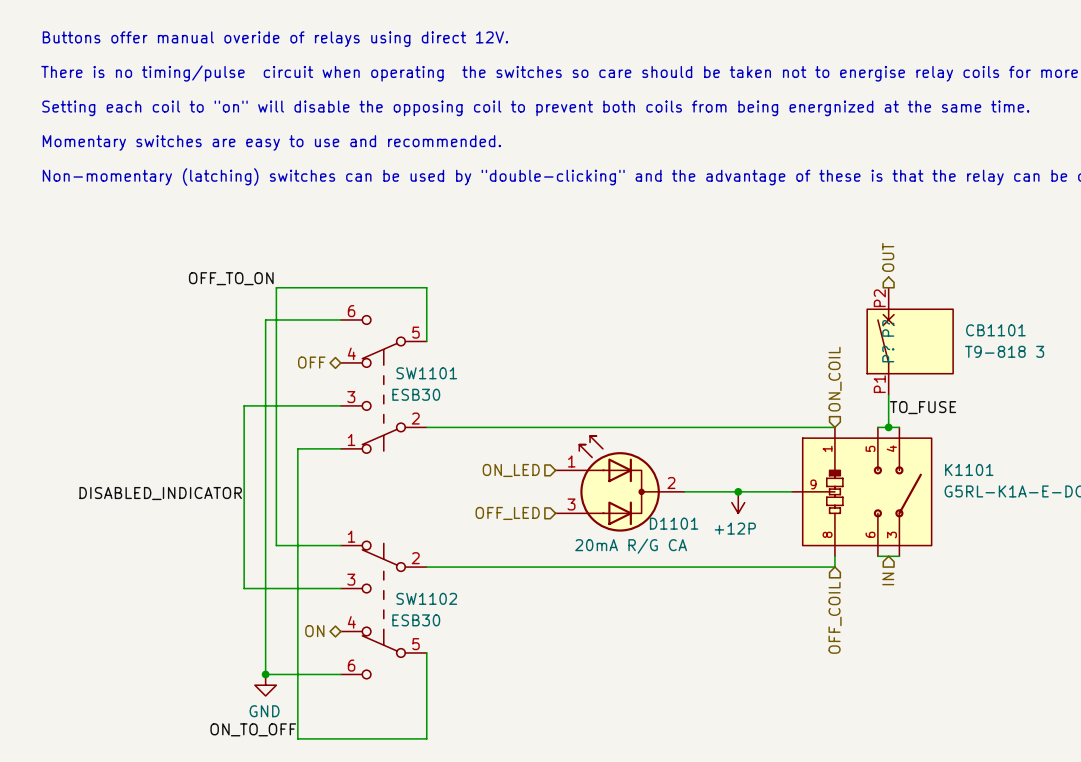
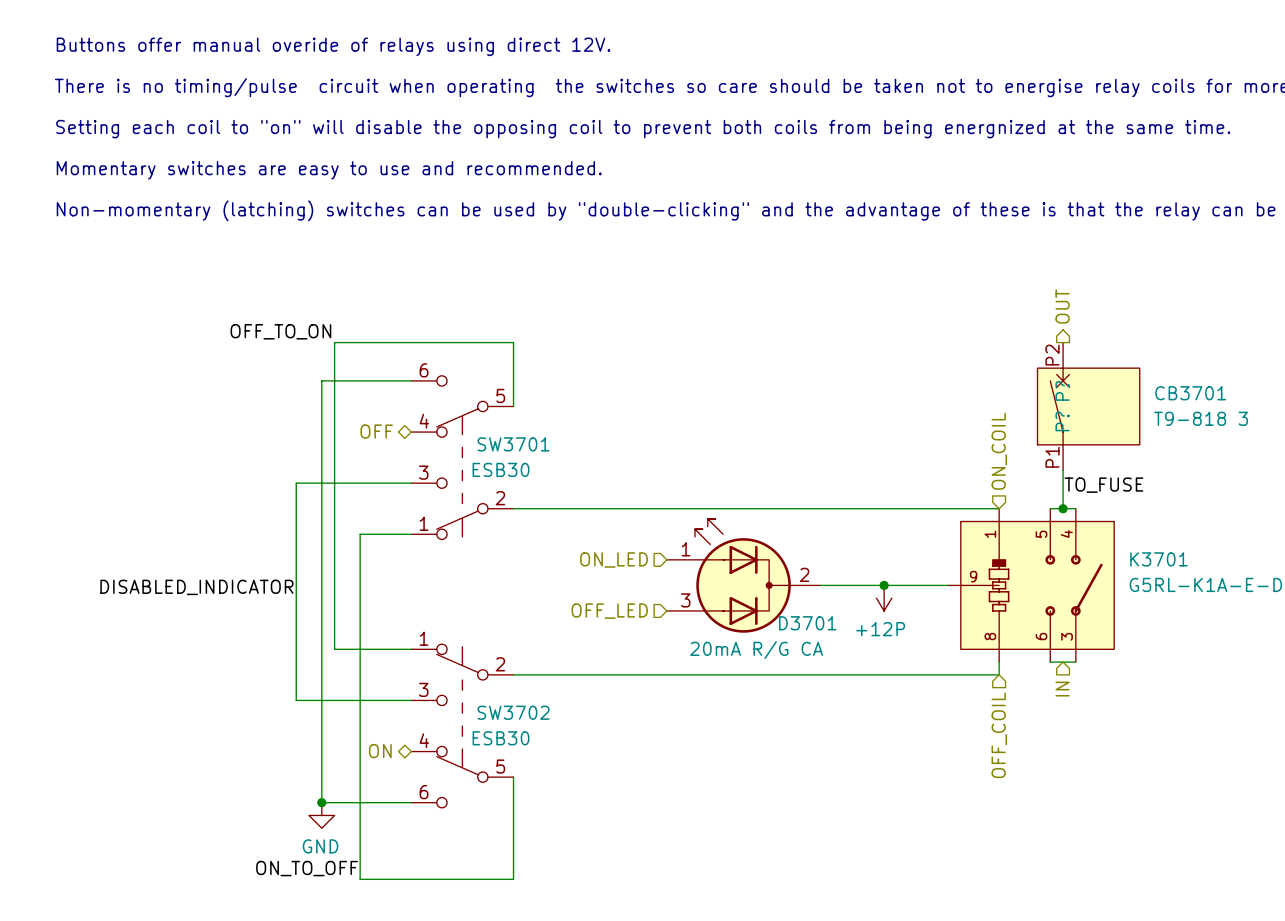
CB1101 name: CB1101 (995, 330) -> CB3701 (1190, 393)
SW1101 name: SW1101 (426, 373) -> SW3701 (513, 444)
K1101 name: K1101 (969, 469) -> K3701 (1159, 559)
D1101 name: D1101 (674, 523) -> D3701 (807, 623)
SW1102 name: SW1102 (426, 598) -> SW3702 (513, 712)

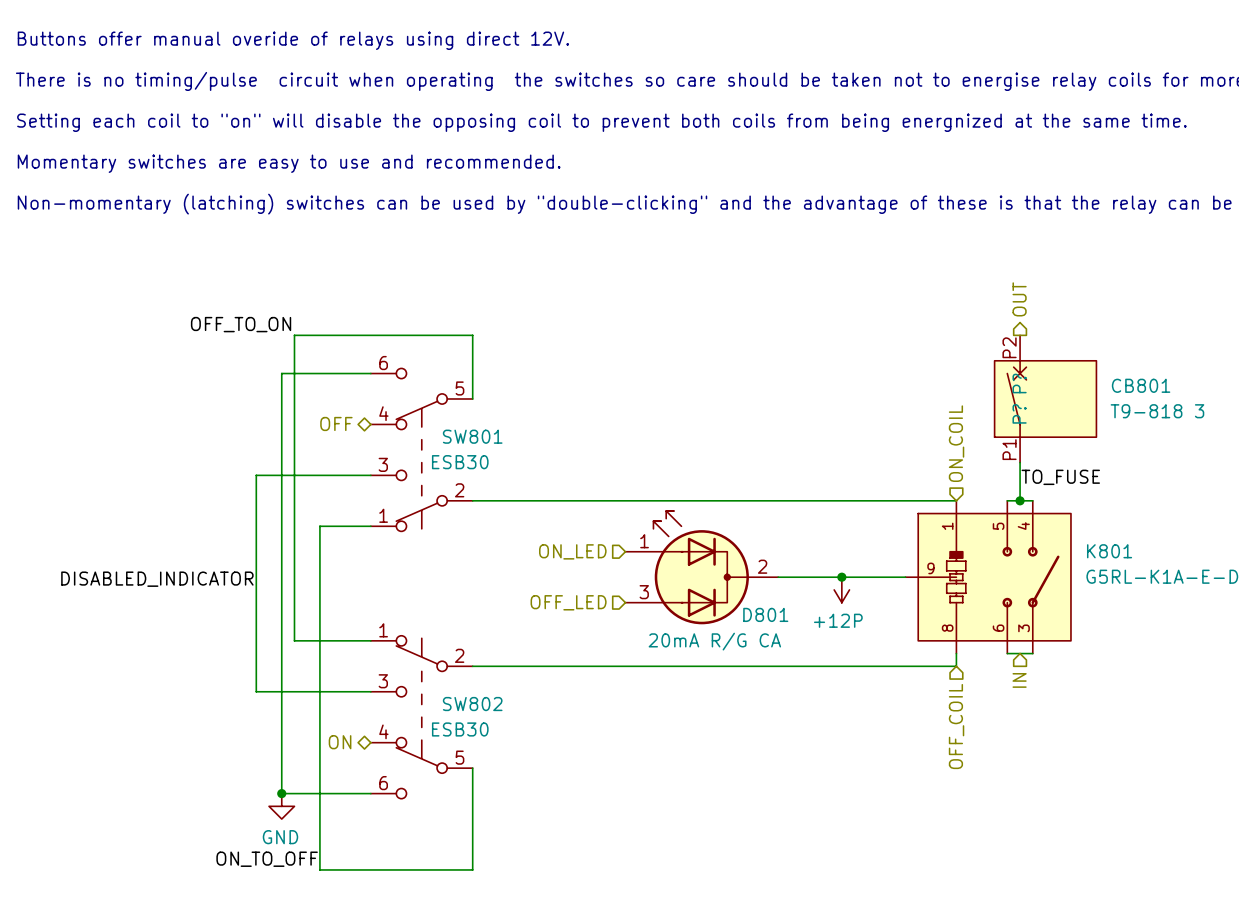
CB3701 name: CB3701 (1190, 393) -> CB801 (1141, 385)
SW3701 name: SW3701 (513, 444) -> SW801 (472, 436)
K3701 name: K3701 (1159, 559) -> K801 (1109, 551)
D3701 name: D3701 (807, 623) -> D801 (765, 614)
SW3702 name: SW3702 (513, 712) -> SW802 (472, 704)

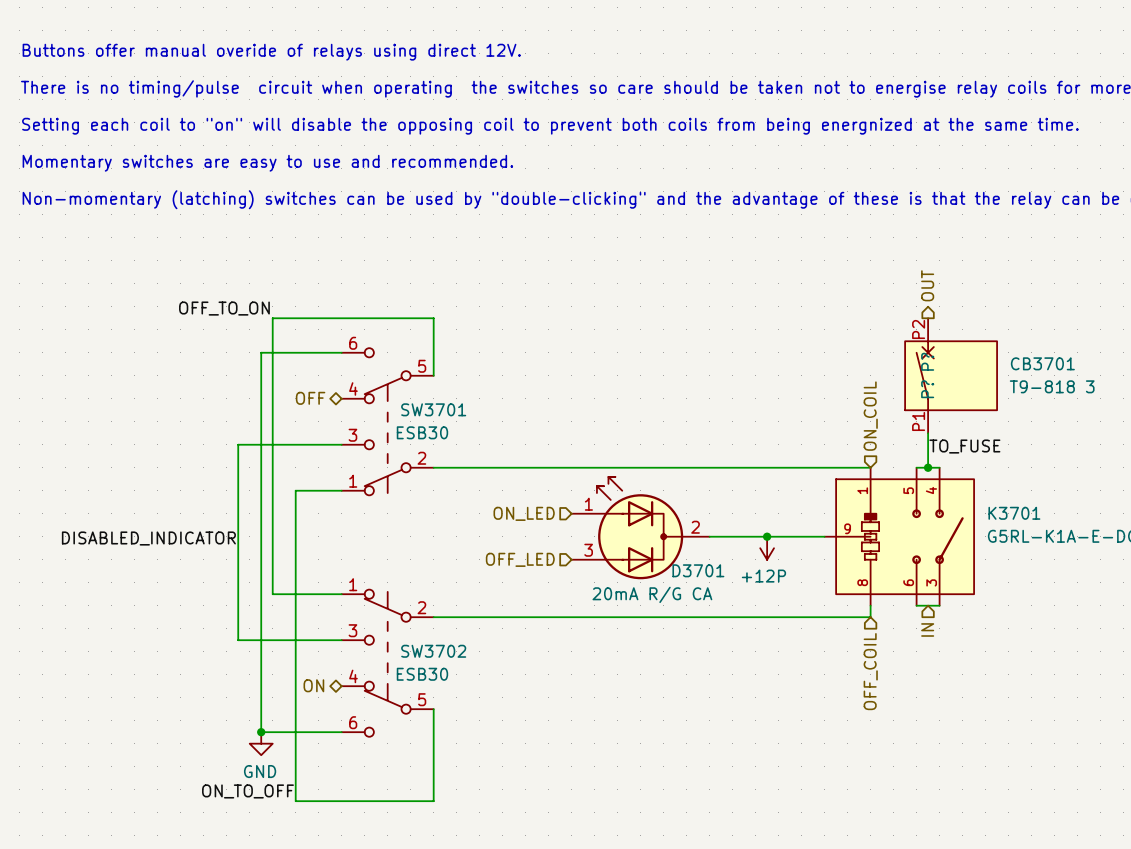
CB801 name: CB801 (1141, 385) -> CB3701 (1042, 363)
SW801 name: SW801 (472, 436) -> SW3701 (433, 409)
K801 name: K801 (1109, 551) -> K3701 (1014, 513)
D801 name: D801 (765, 614) -> D3701 (698, 570)
SW802 name: SW802 (472, 704) -> SW3702 (433, 651)

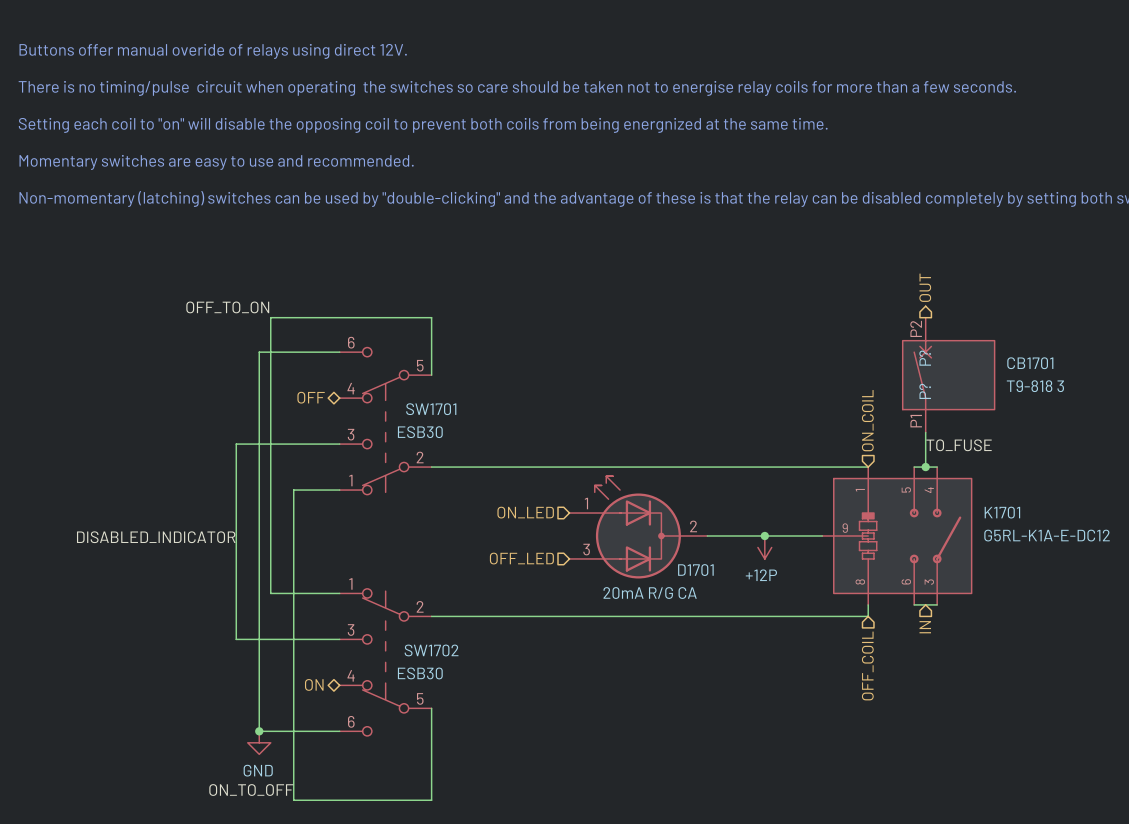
CB3701 name: CB3701 (1042, 363) -> CB1701 (1030, 363)
SW3701 name: SW3701 (433, 409) -> SW1701 (431, 409)
K3701 name: K3701 (1014, 513) -> K1701 (1002, 512)
D3701 name: D3701 (698, 570) -> D1701 (695, 570)
SW3702 name: SW3702 (433, 651) -> SW1702 (431, 650)

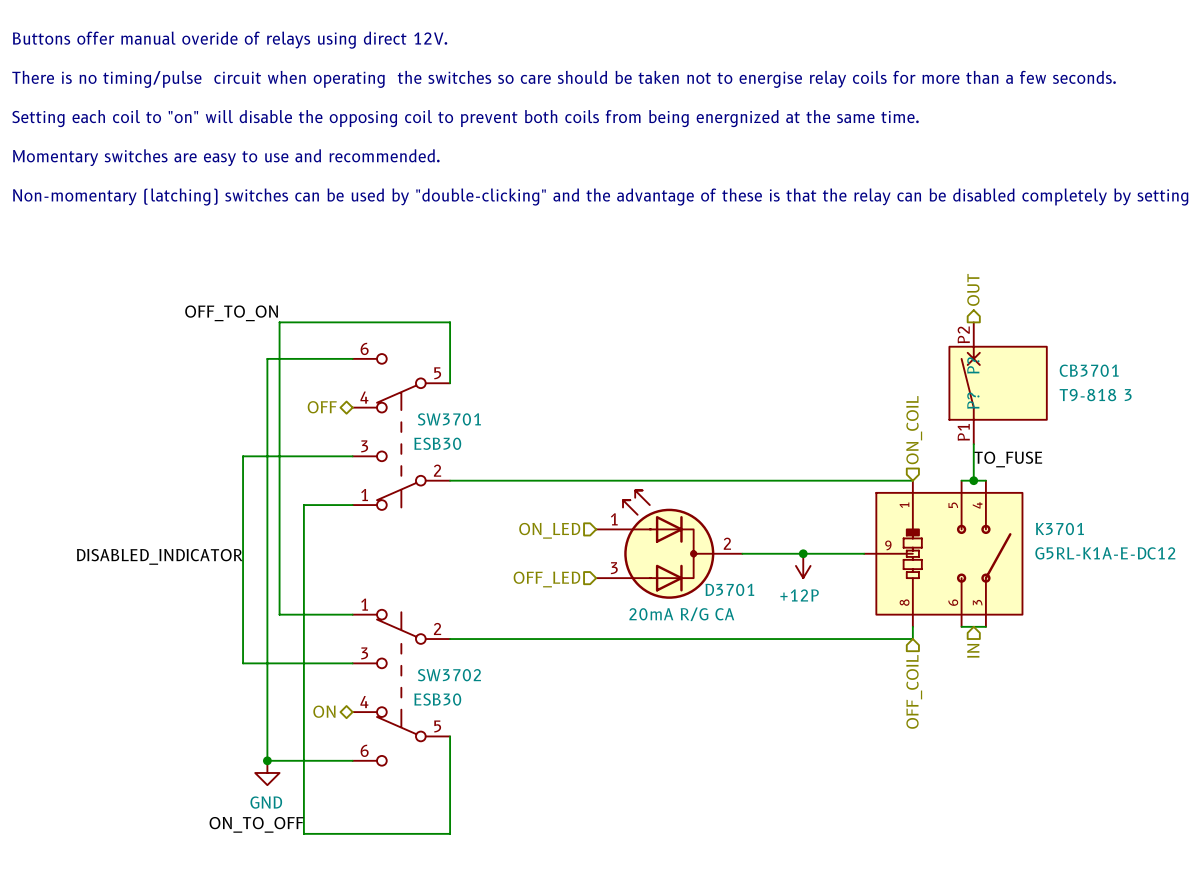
CB1701 name: CB1701 (1030, 363) -> CB3701 (1089, 370)
SW1701 name: SW1701 (431, 409) -> SW3701 (449, 419)
K1701 name: K1701 (1002, 512) -> K3701 (1059, 529)
D1701 name: D1701 (695, 570) -> D3701 (729, 589)
SW1702 name: SW1702 (431, 650) -> SW3702 (449, 675)

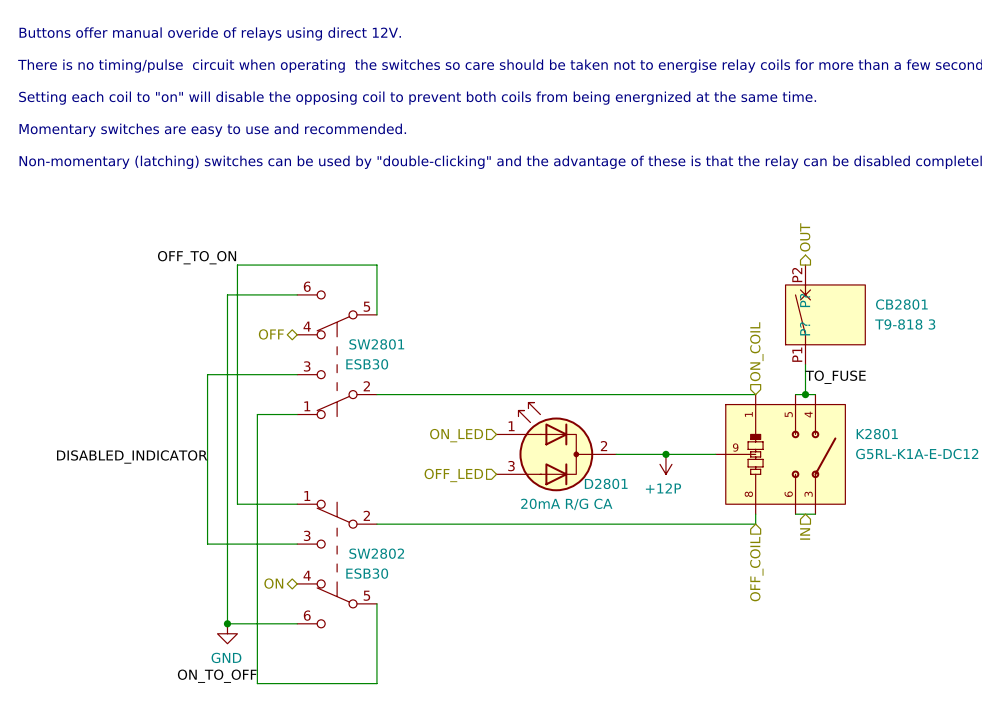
CB3701 name: CB3701 (1089, 370) -> CB2801 (901, 304)
SW3701 name: SW3701 (449, 419) -> SW2801 (376, 344)
K3701 name: K3701 (1059, 529) -> K2801 (877, 434)
D3701 name: D3701 (729, 589) -> D2801 (606, 483)
SW3702 name: SW3702 (449, 675) -> SW2802 (376, 553)

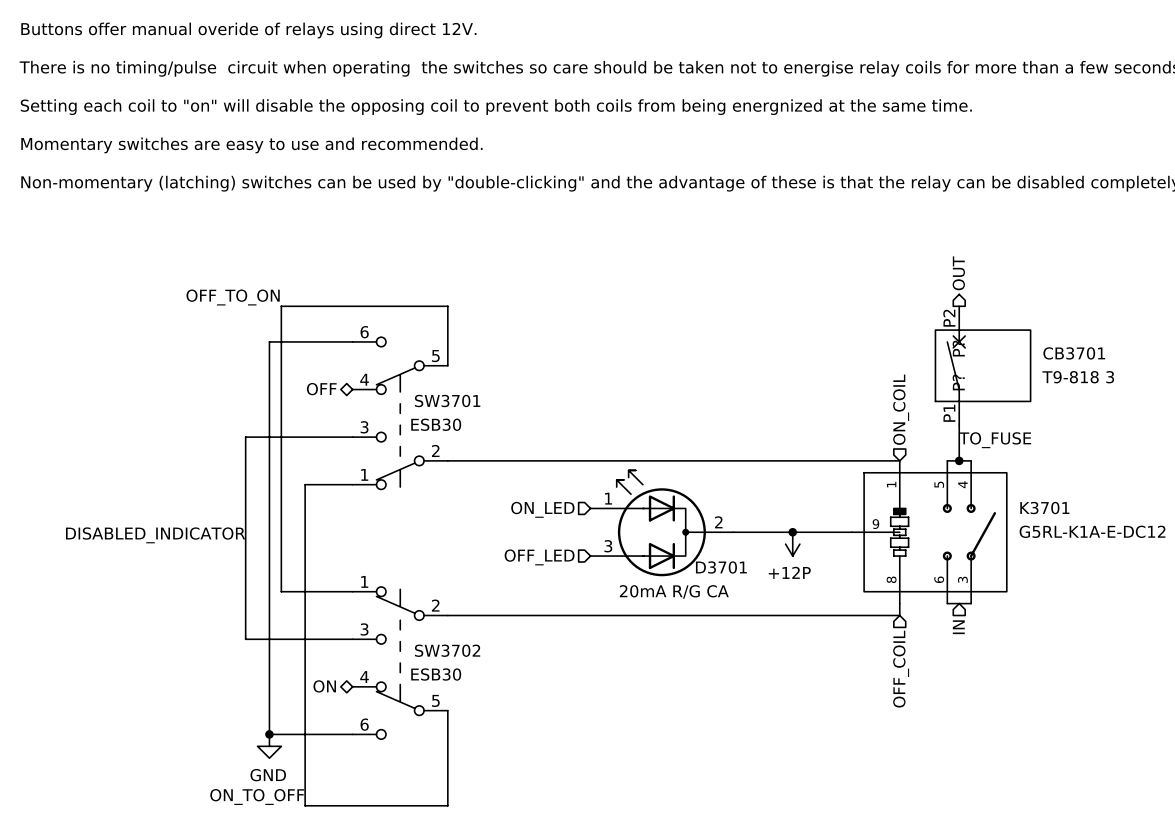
CB2801 name: CB2801 (901, 304) -> CB3701 (1074, 353)
SW2801 name: SW2801 (376, 344) -> SW3701 (447, 400)
K2801 name: K2801 (877, 434) -> K3701 (1044, 508)
D2801 name: D2801 (606, 483) -> D3701 (721, 567)
SW2802 name: SW2802 (376, 553) -> SW3702 (447, 650)

